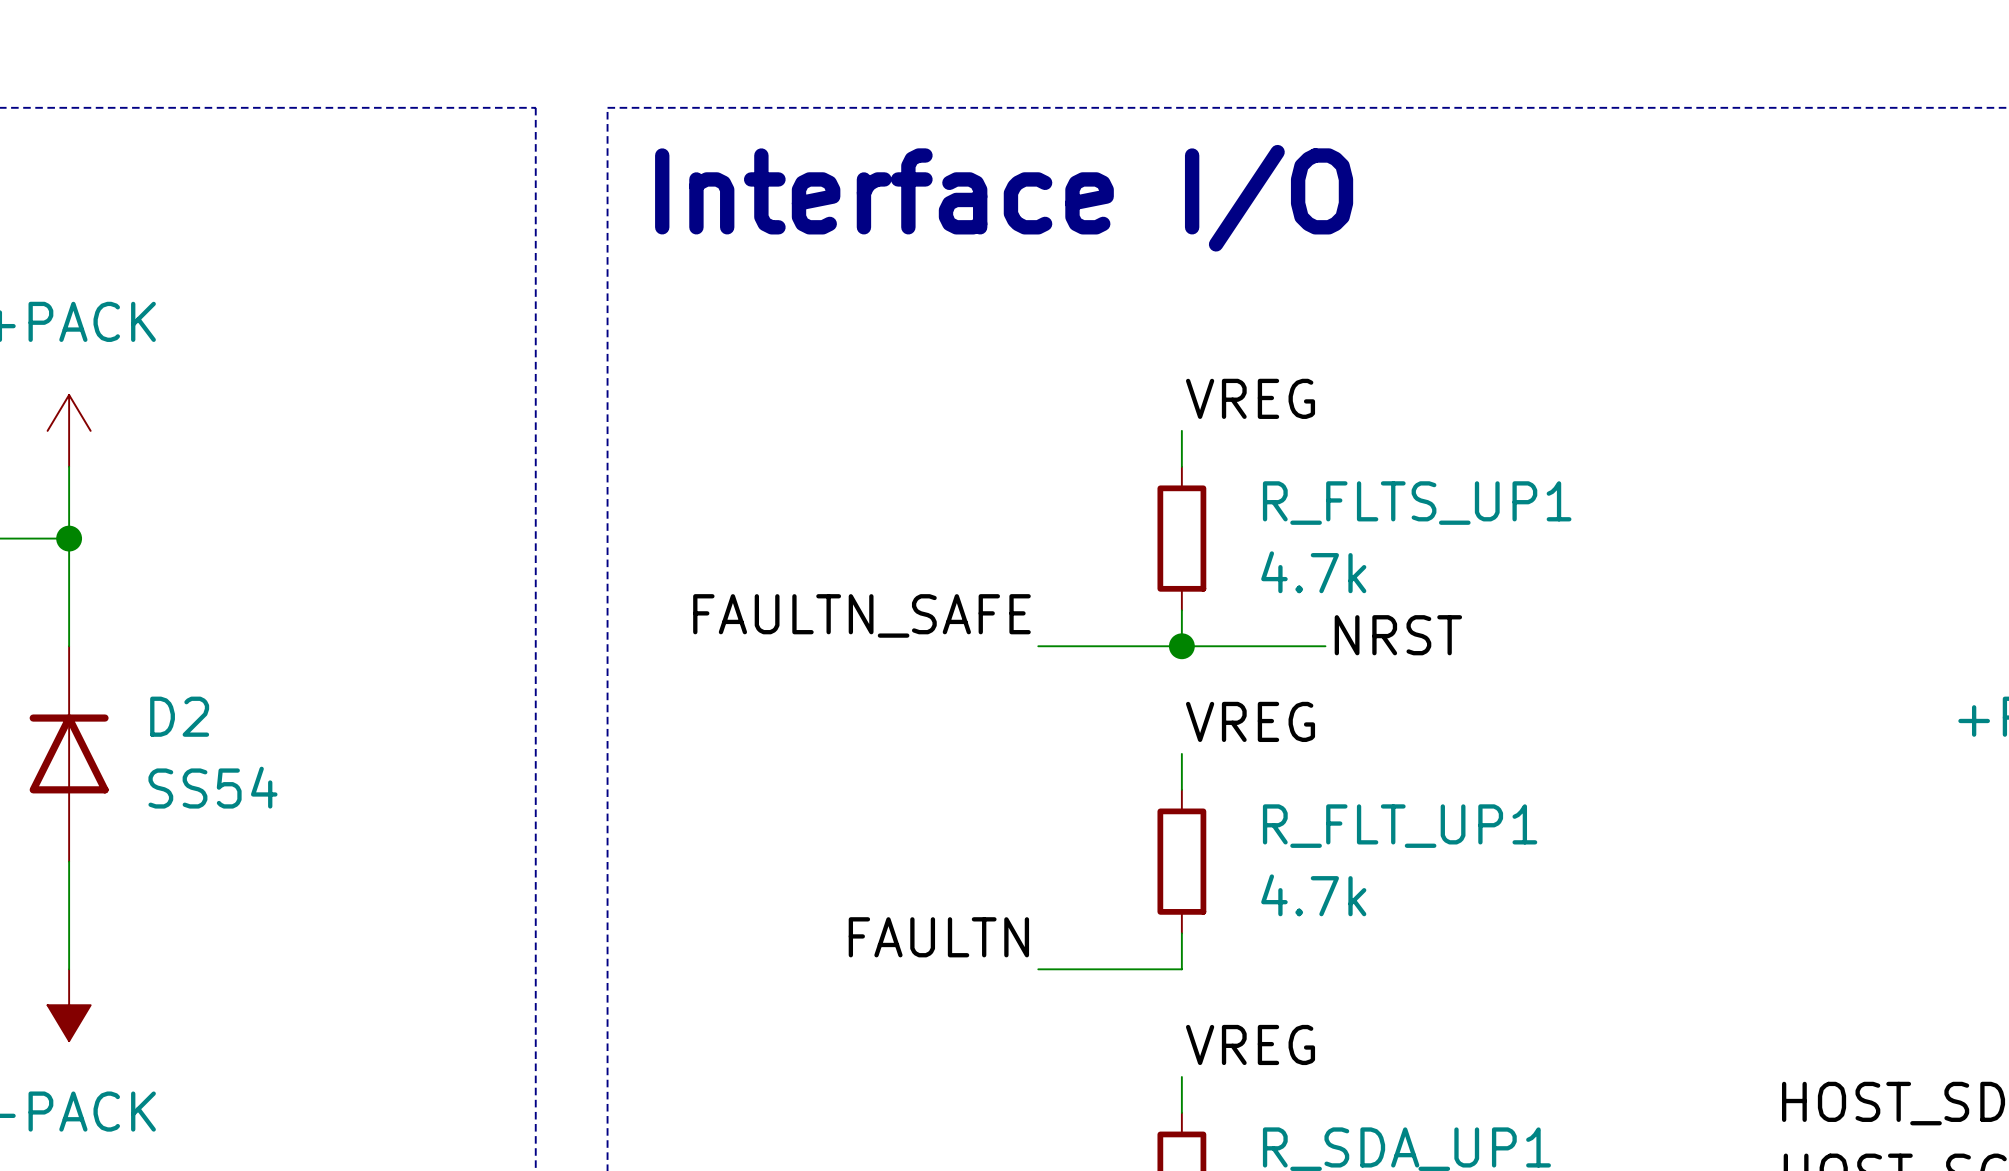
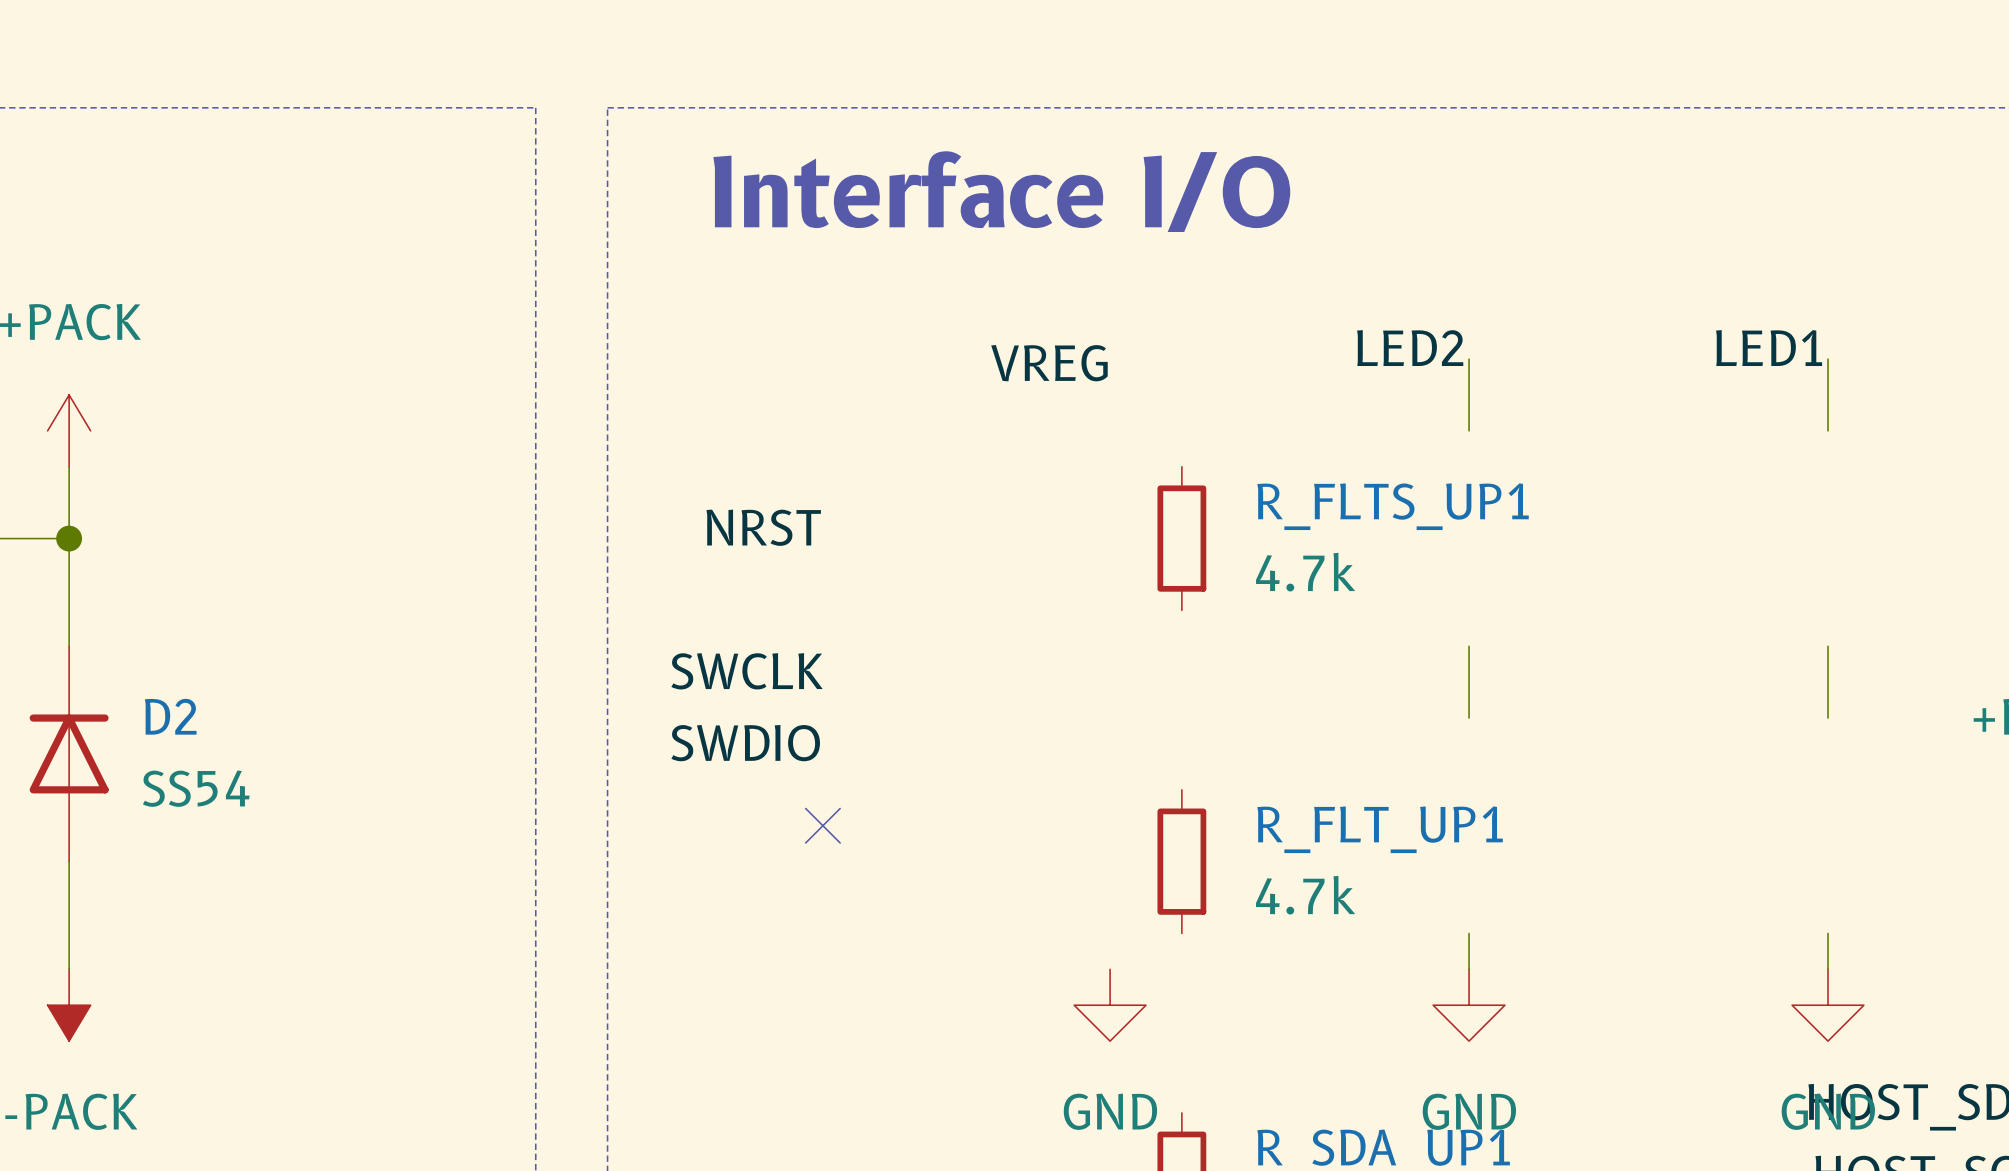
label: none -> LED2 (1410, 348)
label: none -> LED1 (1769, 348)
wire: none -> (1469, 359) (1469, 430)
wire: none -> (1827, 359) (1827, 430)
label position: VREG (1250, 398) -> VREG (1049, 363)
wire: (1181, 430) (1181, 466) -> none
wire: (1181, 610) (1181, 646) -> none
label: FAULTN_SAFE (861, 615) -> none
label position: NRST (1398, 635) -> NRST (763, 527)
wire: (1038, 646) (1325, 646) -> none
junction: (1181, 646) -> none
wire: none -> (1469, 646) (1469, 718)
wire: none -> (1827, 646) (1827, 718)
label: none -> SWCLK (747, 671)
label: VREG (1250, 721) -> none
label: none -> SWDIO (745, 743)
wire: (1181, 753) (1181, 789) -> (1827, 933) (1827, 969)
no-connect mark: none -> (822, 825)
wire: (1181, 933) (1181, 969) (1038, 969) -> none
label: FAULTN (938, 937) -> none
power symbol: none -> GND (1110, 1005)
power symbol: none -> GND (1469, 1005)
power symbol: none -> GND (1827, 1005)
label: VREG (1250, 1044) -> none
wire: (1181, 1077) (1181, 1112) -> (1469, 933) (1469, 969)

